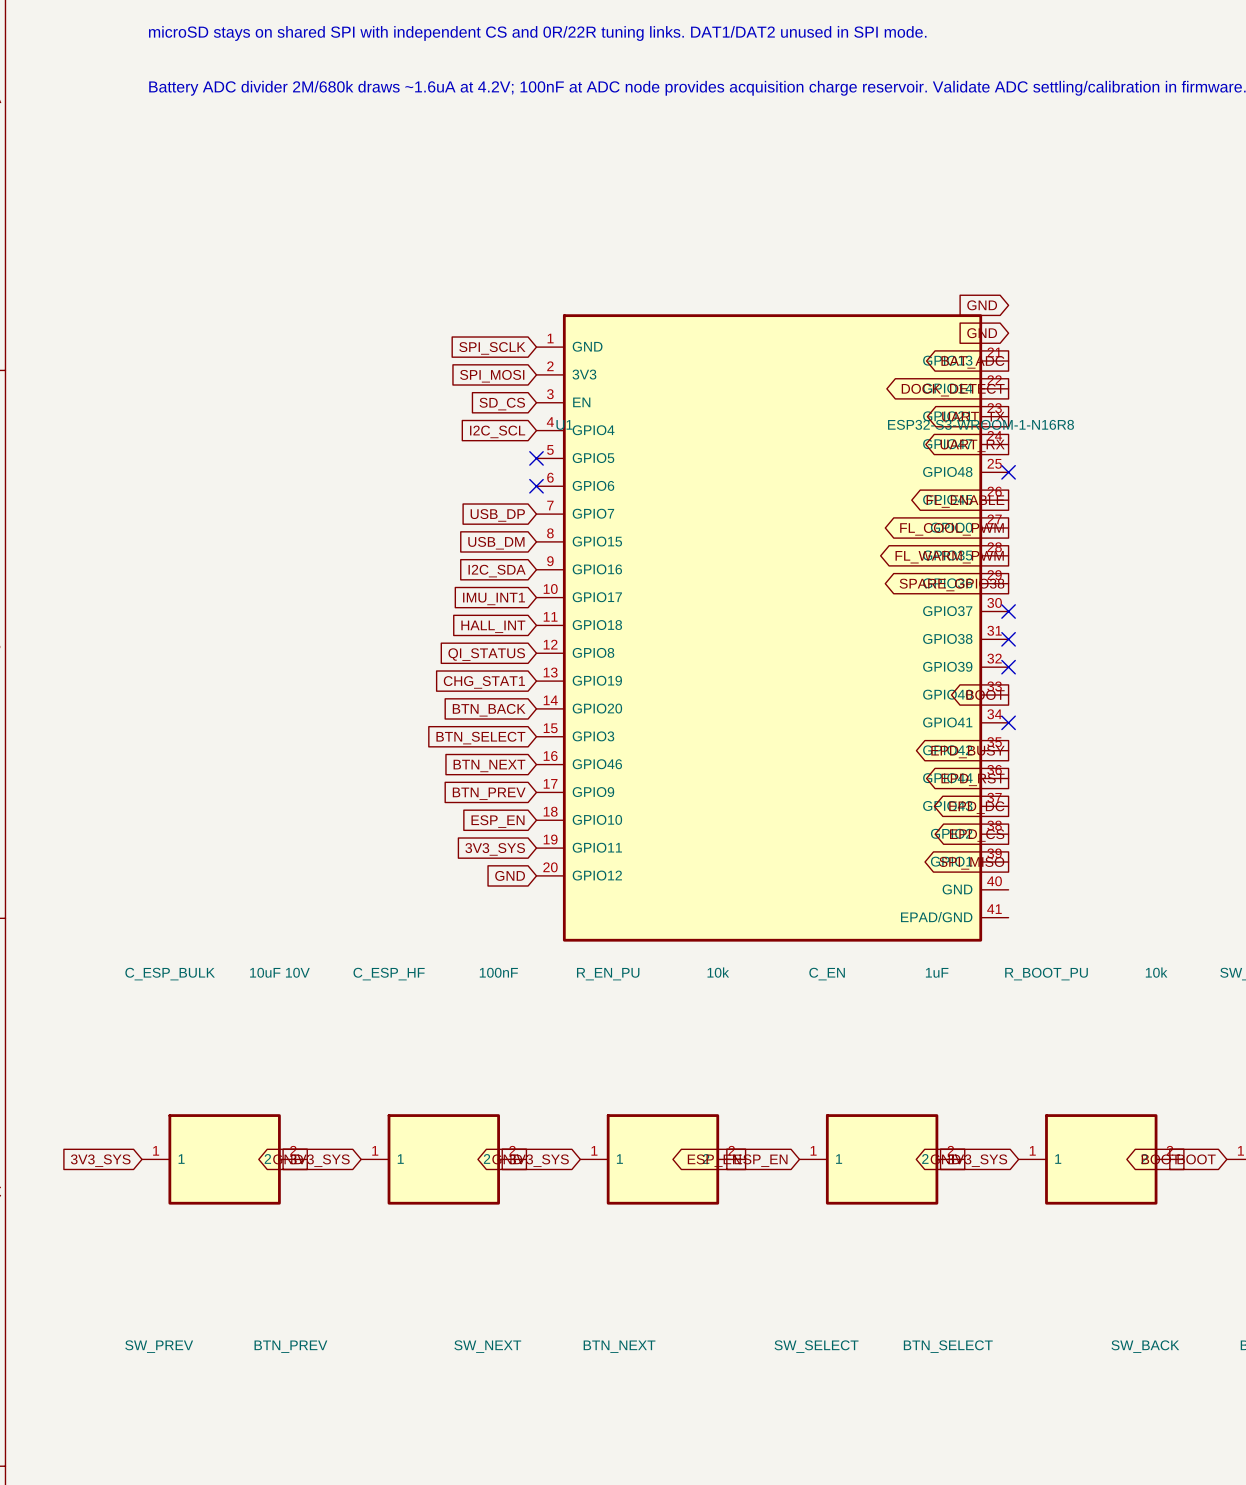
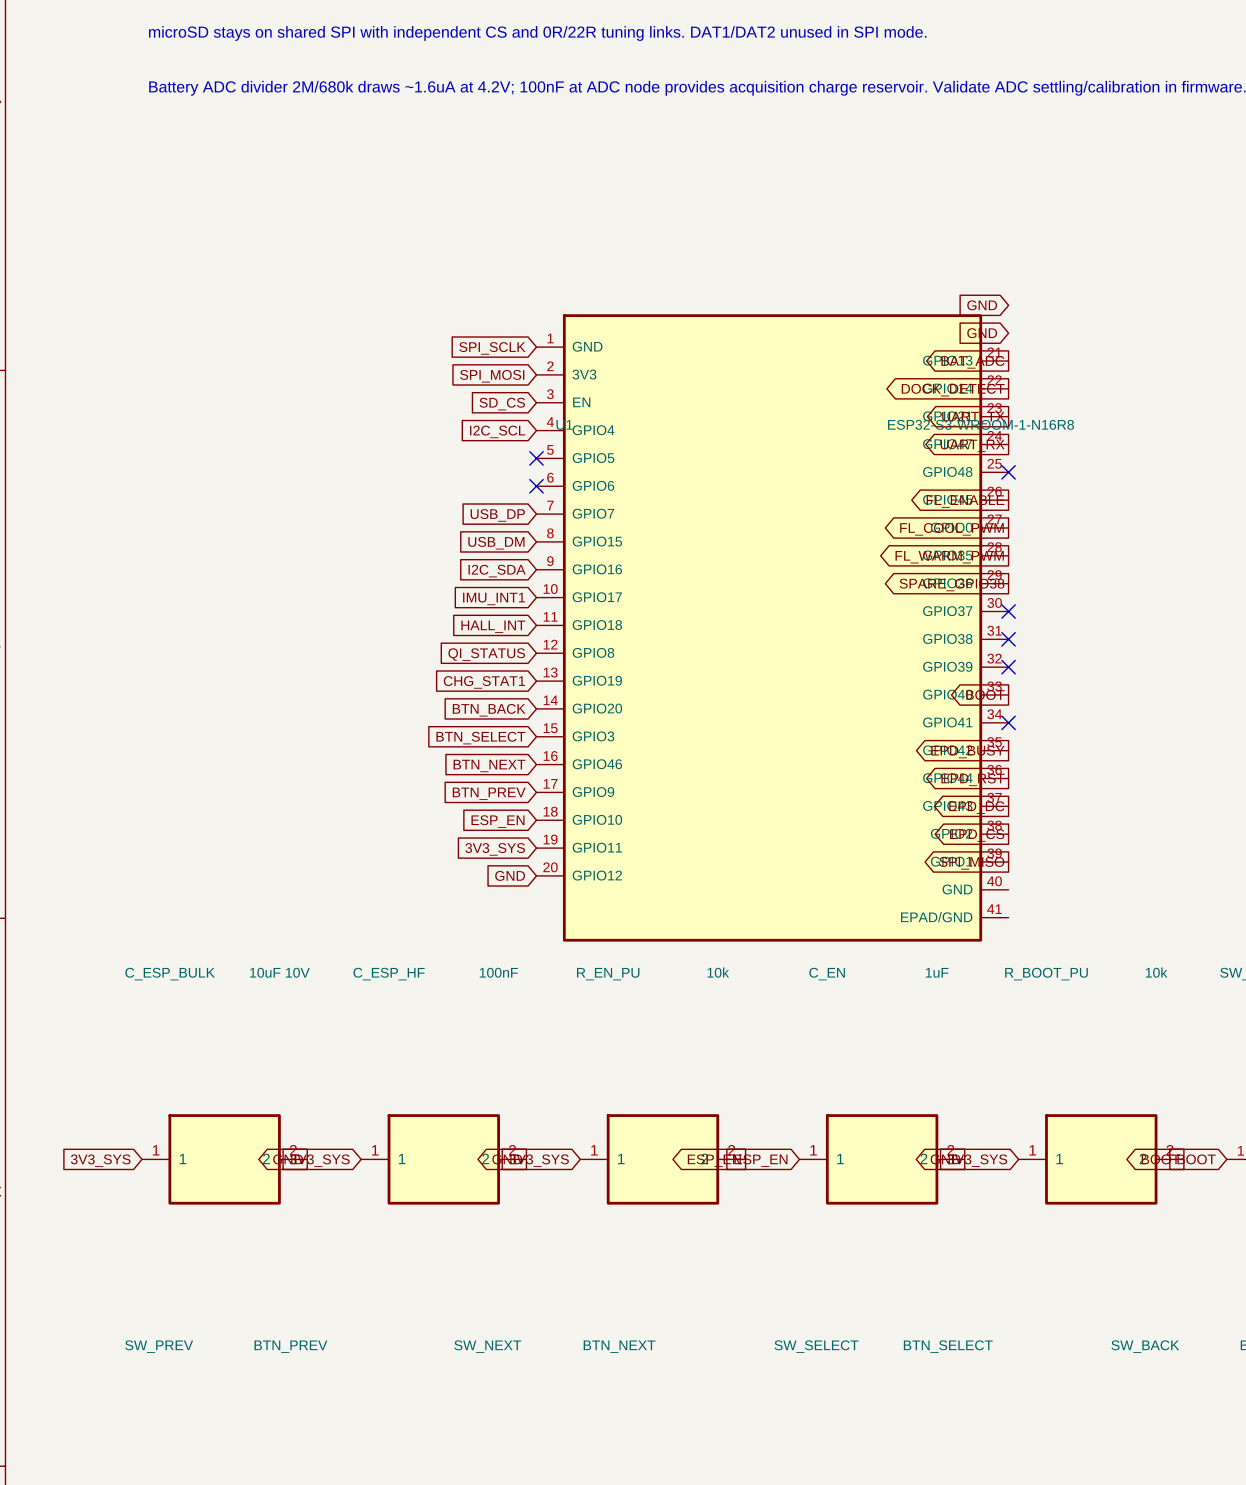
C_ESP_BULK symbol: [142, 1114, 308, 1205] -> [142, 1114, 308, 1205]
C_ESP_HF symbol: [361, 1114, 527, 1205] -> [361, 1114, 527, 1205]
R_EN_PU symbol: [580, 1114, 746, 1205] -> [580, 1114, 746, 1205]
C_EN symbol: [799, 1114, 965, 1205] -> [799, 1114, 965, 1205]
R_BOOT_PU symbol: [1018, 1114, 1184, 1205] -> [1018, 1114, 1184, 1205]

